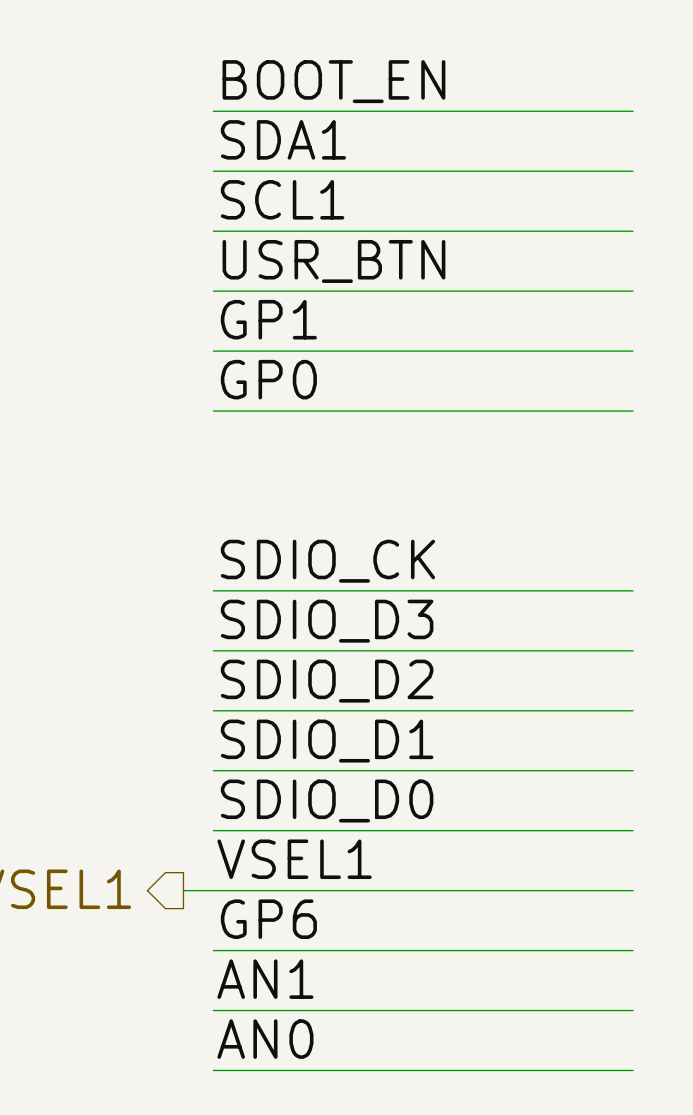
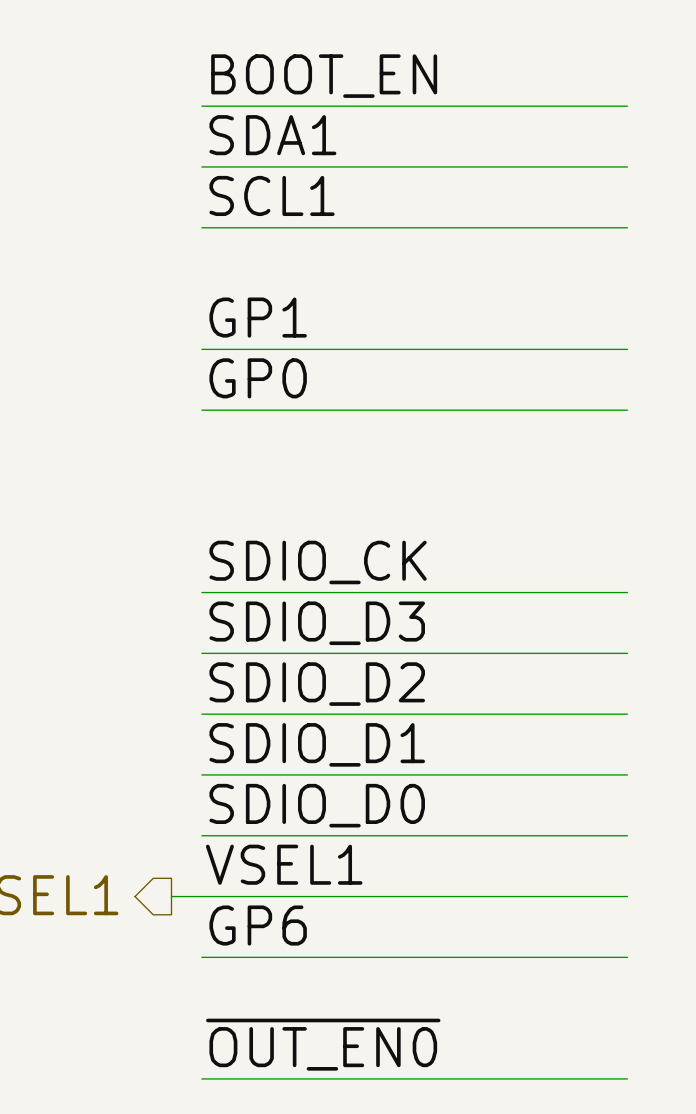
label: USR_BTN (333, 261) -> none
wire: (213, 291) (633, 291) -> none
label: AN1 (265, 979) -> none
wire: (213, 1010) (633, 1010) -> none
label: AN0 (265, 1039) -> ~{OUT_EN0} (323, 1044)

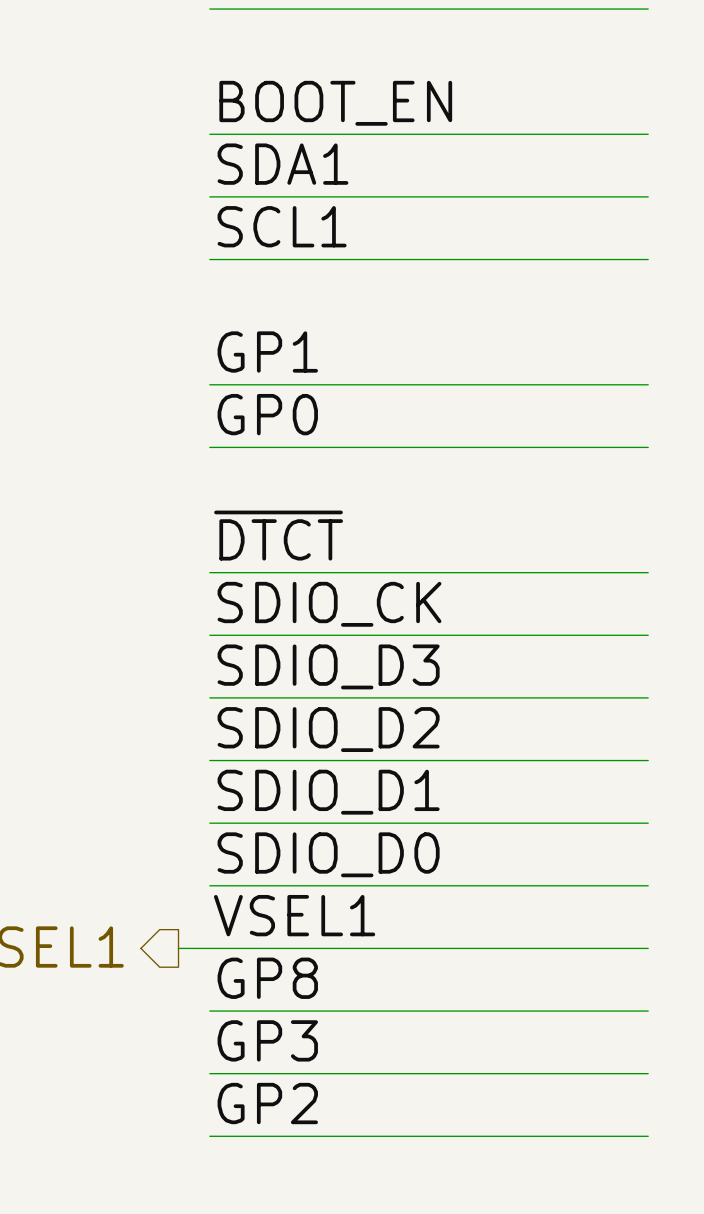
label: none -> ~{DTCT} (278, 535)
wire: none -> (209, 572) (648, 572)
label: GP6 (258, 925) -> GP8 (267, 978)
label: none -> GP3 (267, 1040)
wire: none -> (209, 1073) (648, 1073)
label: ~{OUT_EN0} (323, 1044) -> GP2 (267, 1103)

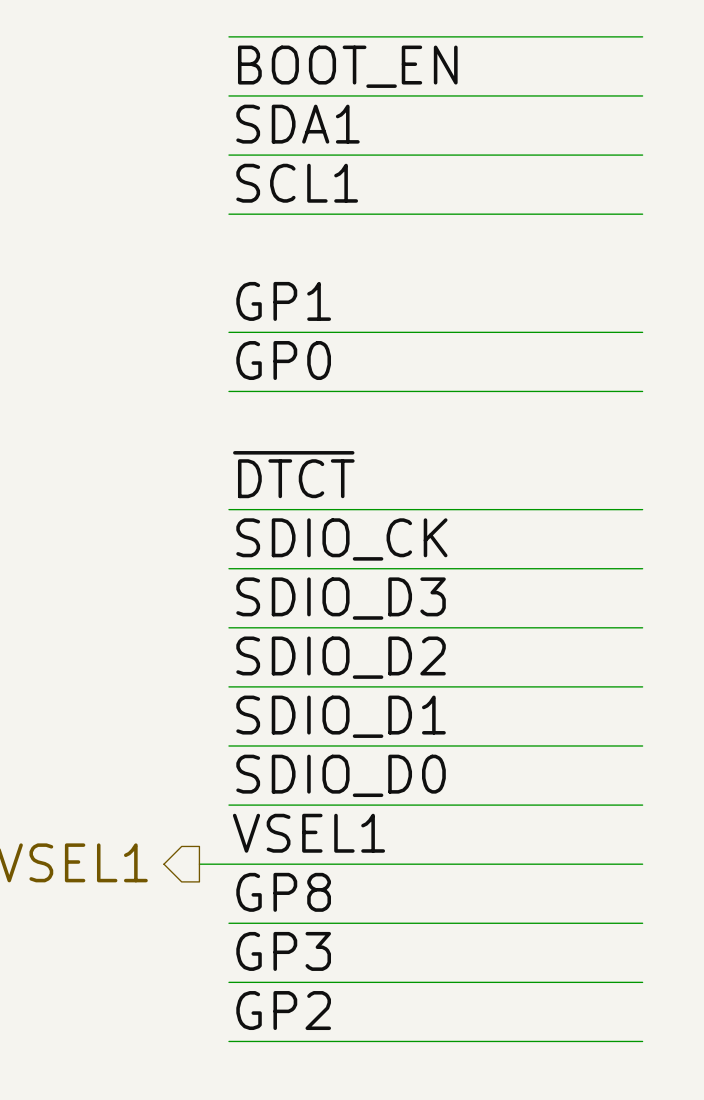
wire: none -> (228, 36) (642, 36)

